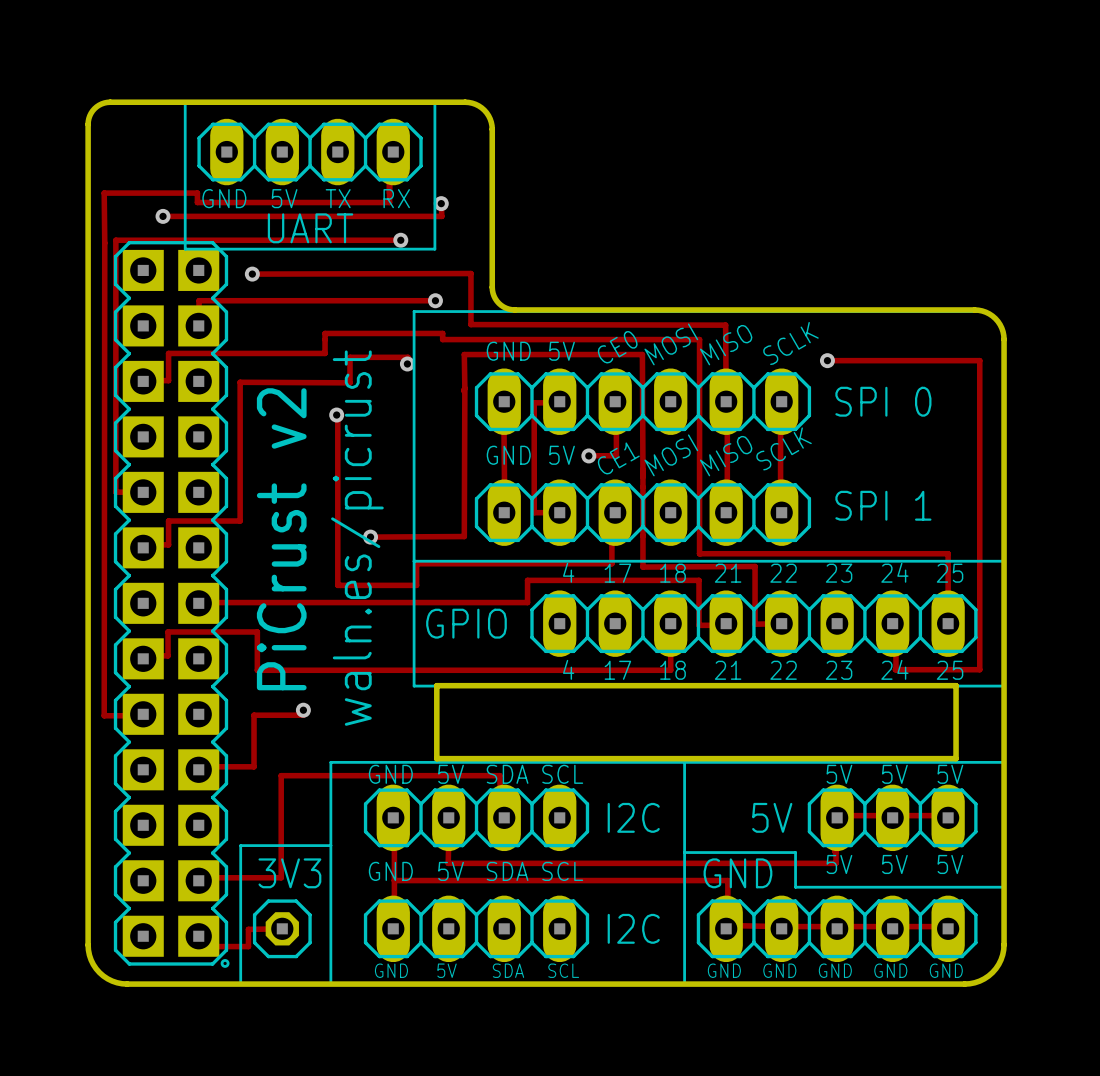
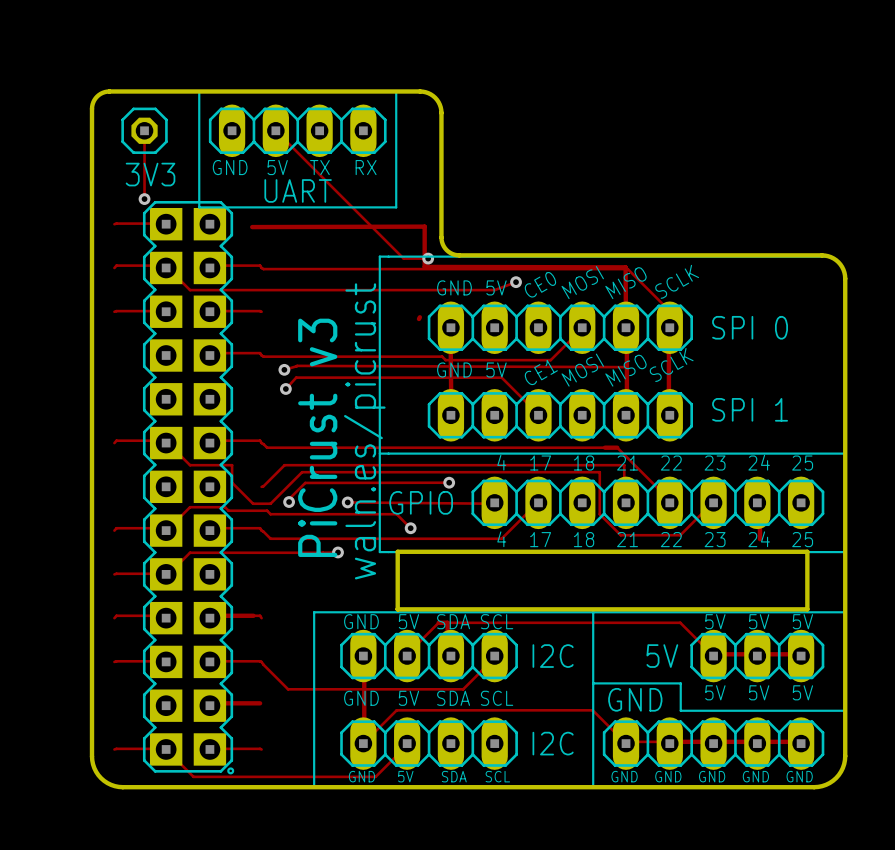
board edge: (110, 102) (101, 103) (94, 108) (89, 115) (88, 124) (88, 945) (91, 959) (99, 972) (112, 981) (127, 984) -> (140, 91) (104, 92) (97, 96) (92, 106) (92, 756) (96, 771) (107, 783) (118, 786) (153, 787)
track: none -> (144, 130) (144, 199)
part: none -> 3V3 (144, 130)
track: none -> (275, 130) (403, 258) (428, 258)
track: (389, 182) (389, 202) (197, 202) (197, 193) (104, 193) (104, 715) (143, 714) -> none
track: (441, 203) (441, 216) (163, 216) -> none
via: (441, 203) -> none
via position: (163, 216) -> (144, 199)
track: (400, 240) (115, 240) (115, 492) (143, 492) -> none
via: (400, 240) -> none
track: none -> (114, 224) (166, 224)
via: (252, 274) -> none
track: (435, 300) (199, 300) (198, 325) -> (669, 327) (669, 311) (627, 269) (263, 269) (260, 265) (211, 265) (209, 267)
via: (435, 300) -> none
via: none -> (428, 258)
track: none -> (114, 267) (116, 265) (165, 265) (190, 290) (494, 290) (516, 282)
via: none -> (516, 282)
track: (827, 360) (979, 360) (979, 669) (895, 669) -> none
via: (827, 360) -> none
track: (407, 363) (407, 357) (350, 357) (350, 382) (240, 382) (240, 521) (168, 521) (168, 544) (145, 544) (143, 547) -> none
via: (407, 363) -> none
track: none -> (114, 311) (166, 311)
track: (143, 381) (168, 380) (168, 353) (325, 353) (325, 333) (442, 333) (442, 339) (699, 339) (699, 553) -> (209, 443) (211, 440) (260, 440) (267, 447) (605, 447)
track: none -> (209, 311) (261, 311)
track: (559, 401) (534, 402) (534, 512) (559, 512) -> none
track: (615, 401) (611, 402) (616, 402) (616, 455) (588, 455) -> none
track: none -> (582, 327) (550, 360) (445, 360) (442, 356) (263, 356) (260, 353) (211, 353) (209, 355)
track: (336, 415) (337, 411) (337, 585) (416, 585) (416, 563) (611, 563) (611, 513) (615, 512) -> (285, 388) (296, 377) (501, 377) (538, 415)
via: (336, 415) -> none
track: none -> (627, 367) (297, 365) (284, 369)
via: none -> (284, 369)
via: (588, 455) -> none
track: (642, 469) (642, 567) (755, 566) (755, 624) (781, 623) -> (617, 447) (669, 500) (669, 502)
track: (642, 476) (642, 354) (464, 354) (464, 536) (370, 537) -> none
via: none -> (285, 388)
via: (370, 537) -> none
text position: waln.es/picrust (357, 538) -> waln.es/picrust (364, 431)
text: PiCrust v2 (281, 539) -> PiCrust v3 (317, 437)
track: none -> (114, 443) (116, 440) (165, 440) (190, 465) (232, 465) (232, 482) (253, 503) (270, 503) (302, 472) (599, 472) (599, 514) (620, 535) (680, 535) (713, 502)
track: (715, 553) (948, 553) (948, 623) -> none
track: none -> (449, 482) (305, 482) (289, 499) (289, 502)
via: none -> (449, 482)
track: (198, 603) (527, 602) (527, 580) (699, 580) (699, 625) (726, 625) (727, 623) -> none
track: none -> (261, 486) (284, 465) (624, 465) (624, 500) (626, 502)
via: none -> (289, 502)
track: none -> (347, 502) (494, 502)
via: none -> (347, 502)
track: none -> (538, 502) (501, 538) (270, 538) (260, 528) (211, 528) (209, 530)
track: (670, 623) (670, 670) (257, 670) (257, 631) (168, 631) (168, 655) (145, 655) (143, 658) -> none
track: none -> (410, 528) (396, 514) (270, 514) (267, 510) (228, 510) (225, 507) (190, 507) (166, 530) (165, 528) (116, 528) (114, 530)
via: none -> (410, 528)
track: none -> (338, 552) (190, 552) (169, 573) (114, 574)
via: none -> (338, 552)
track: (303, 710) (303, 715) (254, 715) (254, 766) -> (261, 618) (260, 615) (253, 615)
via: (303, 710) -> none
track: none -> (114, 618) (116, 615) (165, 615) (166, 618)
track: (488, 775) (281, 775) (281, 877) (262, 877) -> (438, 622) (407, 654)
track: (839, 815) (834, 817) (836, 863) (448, 863) (448, 816) -> (715, 654) (713, 656) (680, 622) (447, 622)
track: none -> (494, 656) (463, 689) (288, 689) (260, 661) (209, 661)
track: none -> (114, 661) (166, 661)
line: (330, 845) (240, 845) (240, 984) -> none
track: (394, 880) (727, 880) (727, 925) (780, 926) (781, 928) (785, 926) -> (363, 743) (396, 710) (592, 710) (626, 743) (627, 741) (672, 741)
track: (282, 928) (248, 929) (248, 946) (197, 946) (198, 936) -> (261, 749) (209, 749)
part: 3V3 (282, 928) -> none
track: none -> (407, 743) (375, 776) (193, 776) (165, 748) (114, 749)

